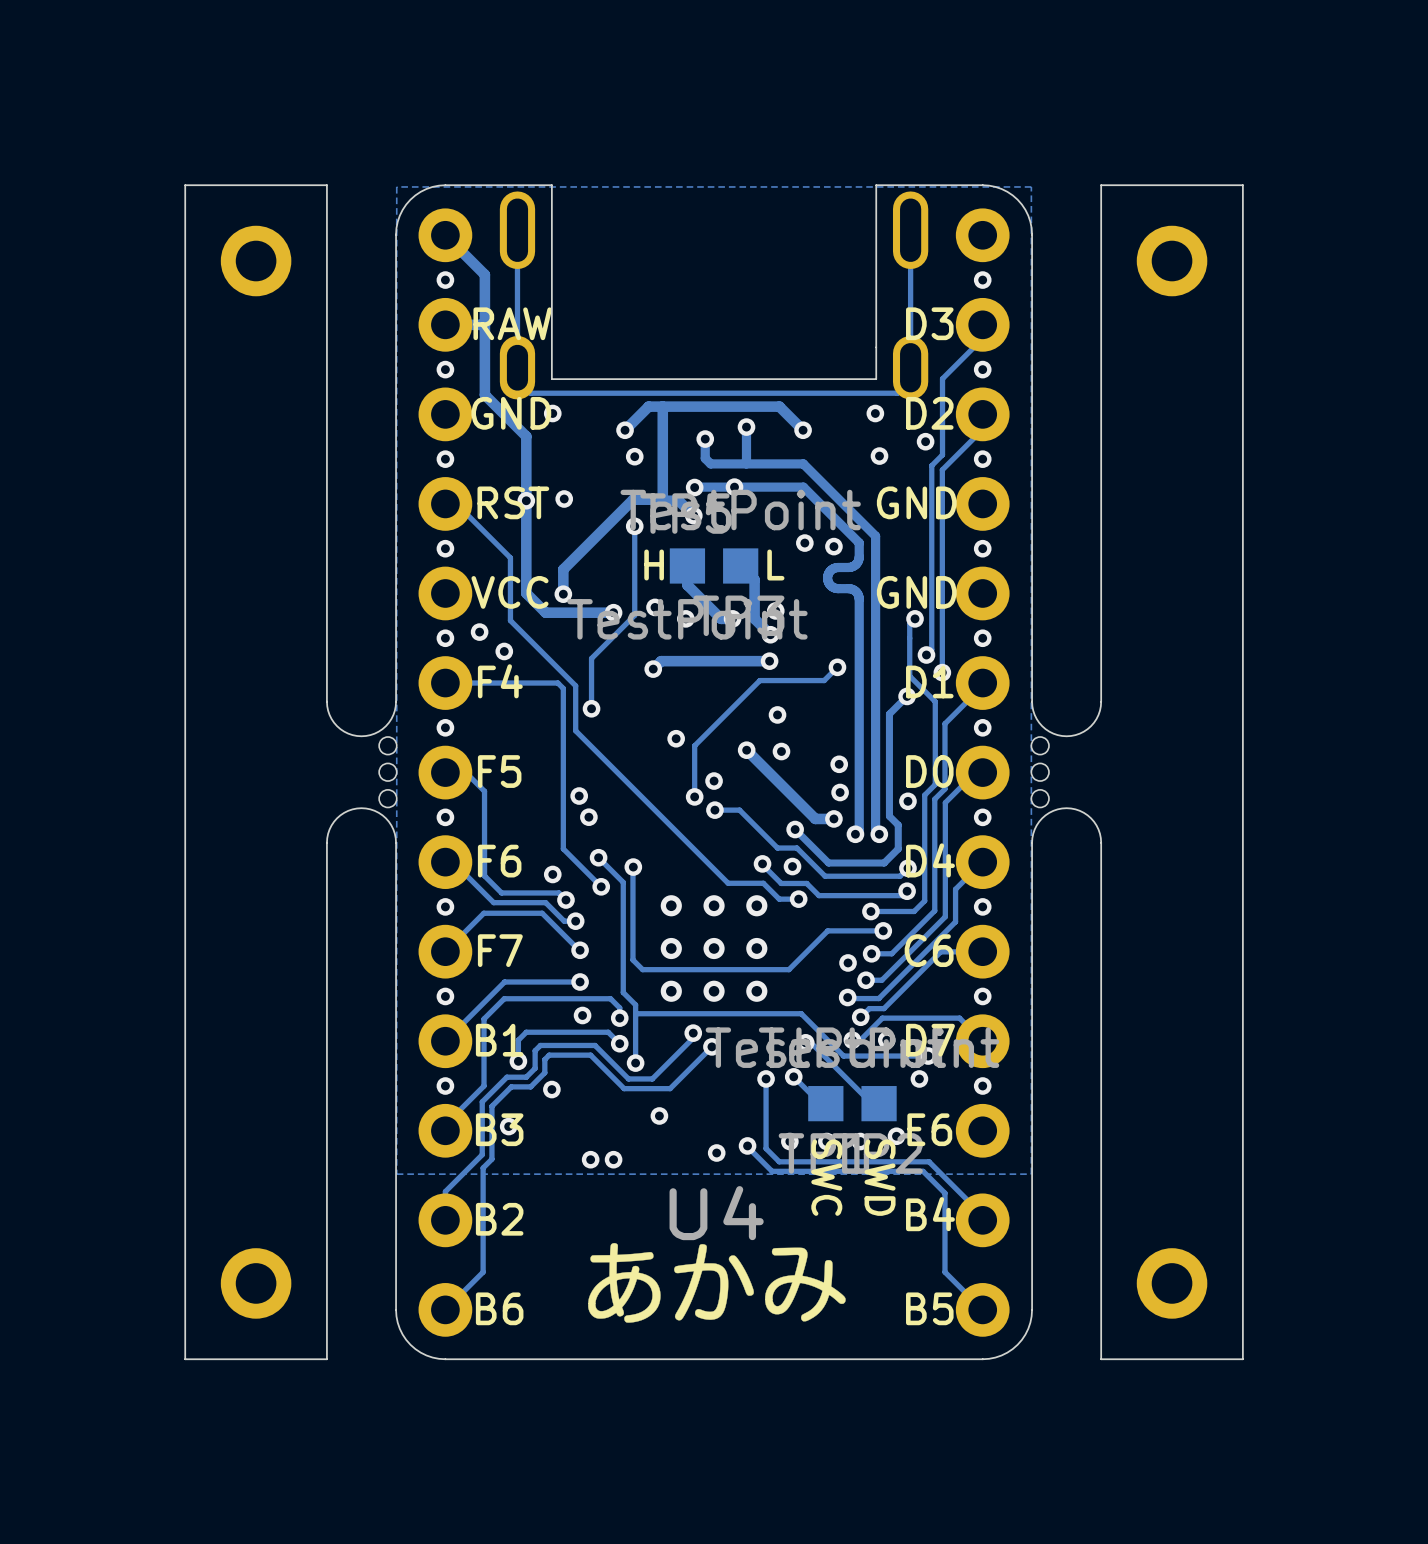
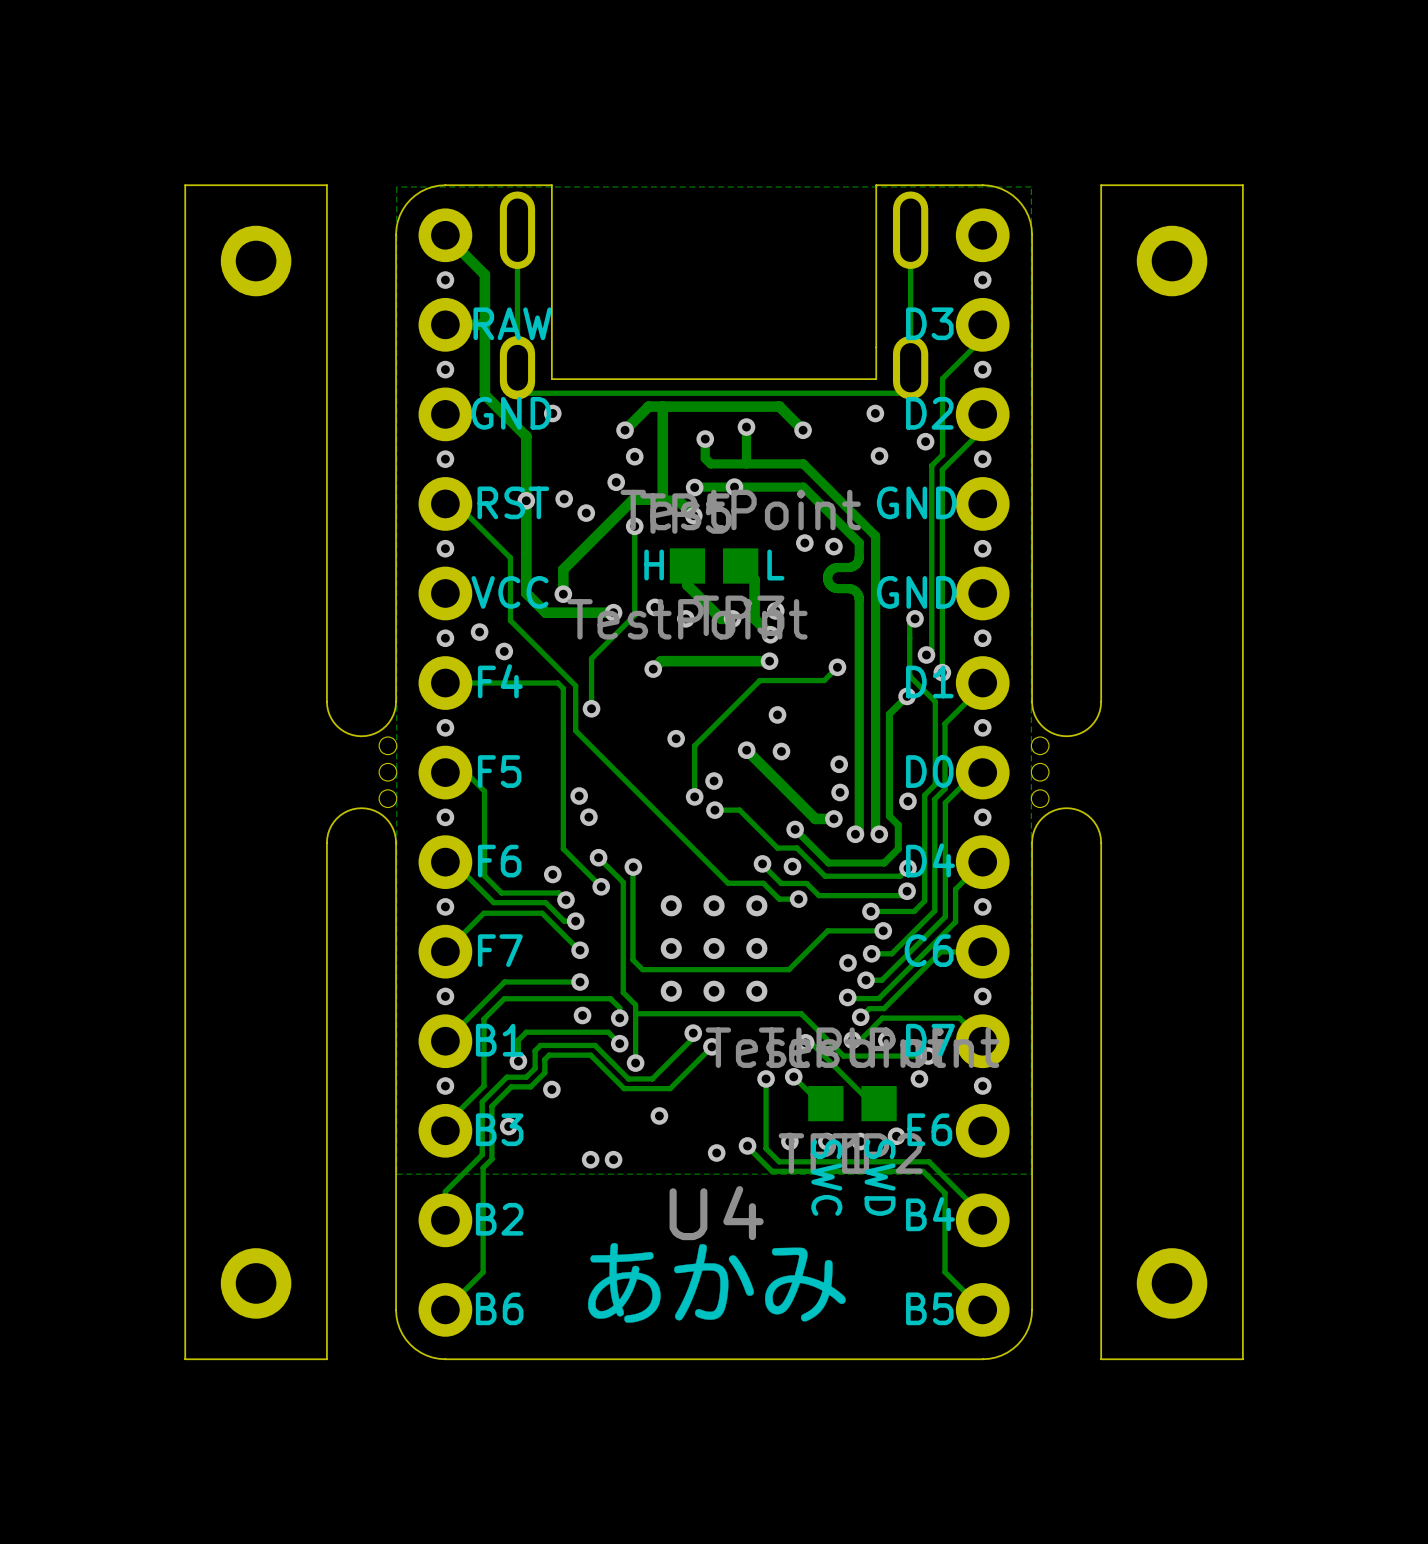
via: none -> (616, 482)
via: none -> (586, 513)

